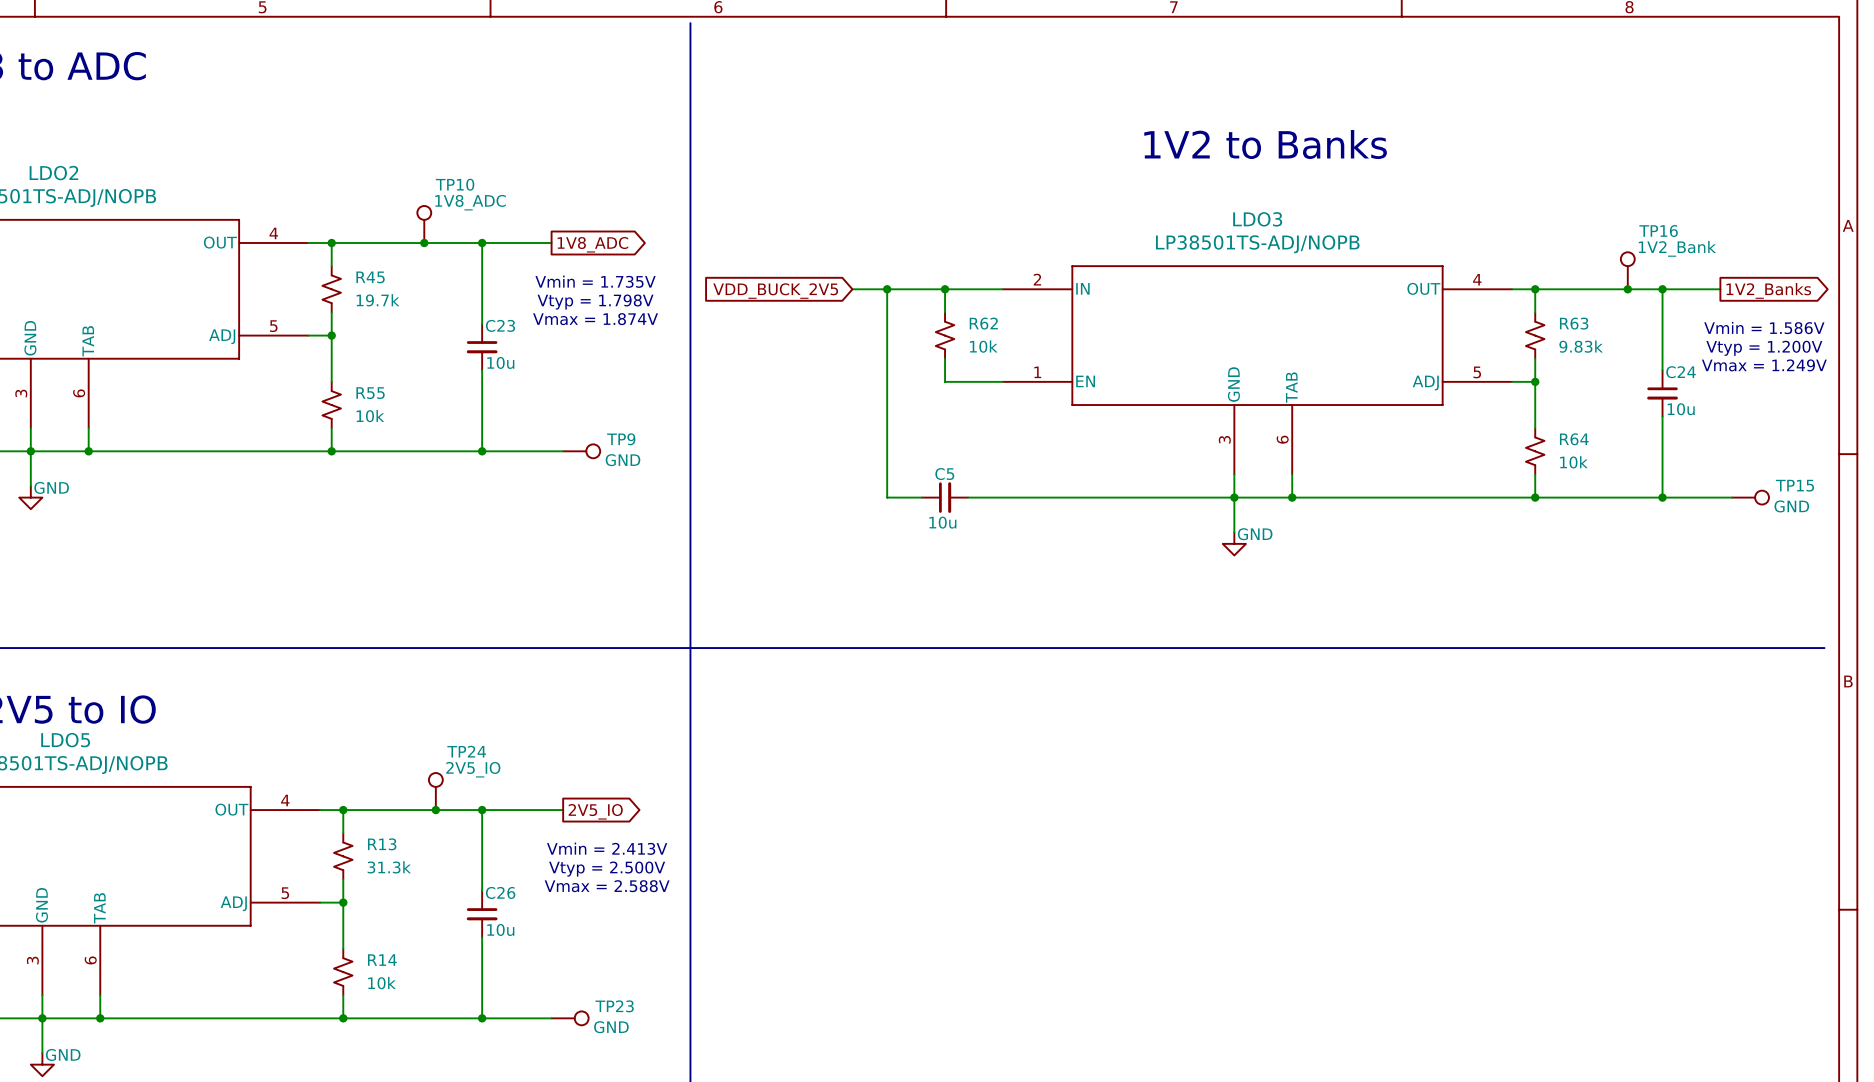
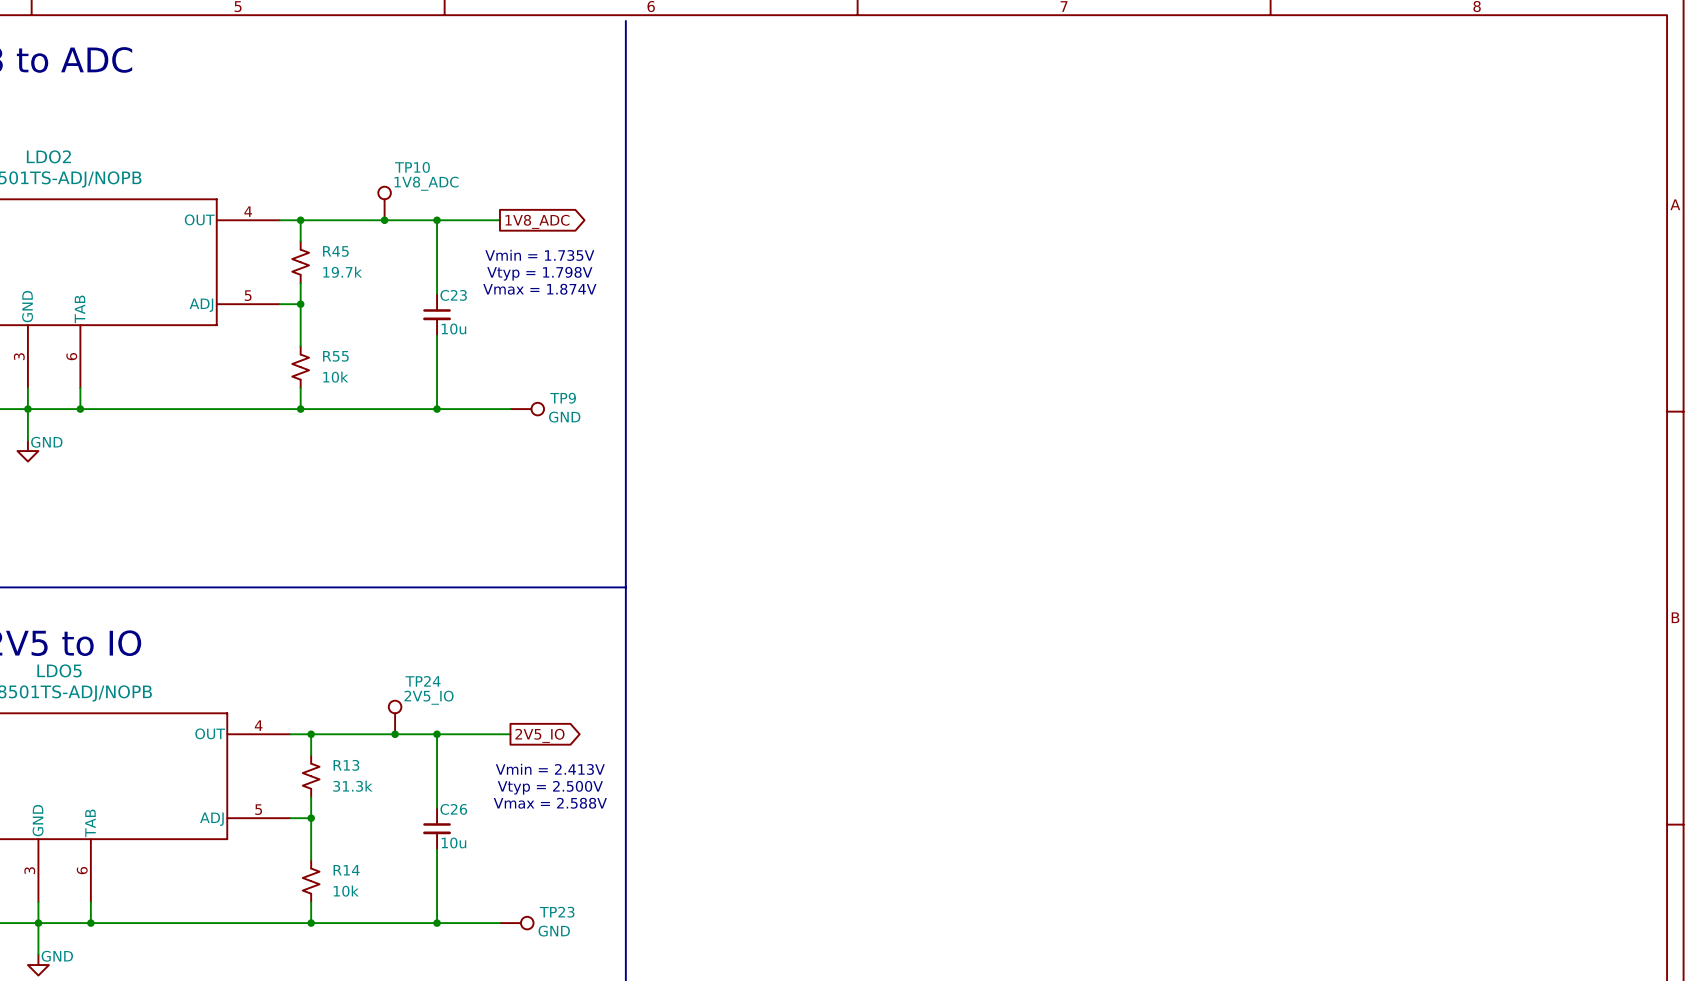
text: 1V2 to Banks (1265, 144) -> none
TP16: 1V2_Bank (1627, 270) -> none
wire: (852, 289) (1002, 289) -> none
wire: (887, 289) (887, 497) (921, 497) -> none
junction: (887, 289) -> none
wire: (945, 289) (945, 312) -> none
junction: (945, 289) -> none
wire: (1512, 289) (1720, 289) -> none
wire: (1535, 289) (1535, 312) -> none
junction: (1535, 289) -> none
junction: (1627, 289) -> none
wire: (1662, 289) (1662, 370) -> none
junction: (1662, 289) -> none
global label: 1V2_Banks (1768, 290) -> none
global label: VDD_BUCK_2V5 (775, 291) -> none
text: Vmin = 1.586V (1764, 328) -> none
R62: 10k (945, 335) -> none
R63: 9.83k (1535, 335) -> none
text: Vtyp = 1.200V (1764, 348) -> none
wire: (945, 358) (945, 381) (1002, 381) -> none
wire: (1535, 358) (1535, 428) -> none
text: Vmax = 1.249V (1764, 365) -> none
LDO3: LP38501TS-ADJ/NOPB (1257, 370) -> none
wire: (1512, 381) (1535, 381) -> none
junction: (1535, 381) -> none
C24: 10u (1662, 393) -> none
wire: (1662, 416) (1662, 497) -> none
R64: 10k (1535, 451) -> none
wire: (1234, 474) (1234, 532) -> none
wire: (1292, 474) (1292, 497) -> none
wire: (1535, 474) (1535, 497) -> none
C5: 10u (945, 497) -> none
wire: (968, 497) (1731, 497) -> none
junction: (1234, 497) -> none
junction: (1292, 497) -> none
junction: (1535, 497) -> none
junction: (1662, 497) -> none
TP15: GND (1750, 497) -> none
power symbol: GND (1234, 543) -> none
line: (690, 648) (1824, 648) -> none

